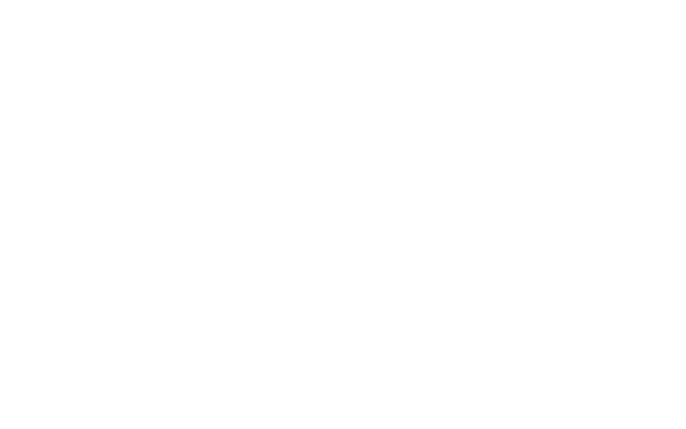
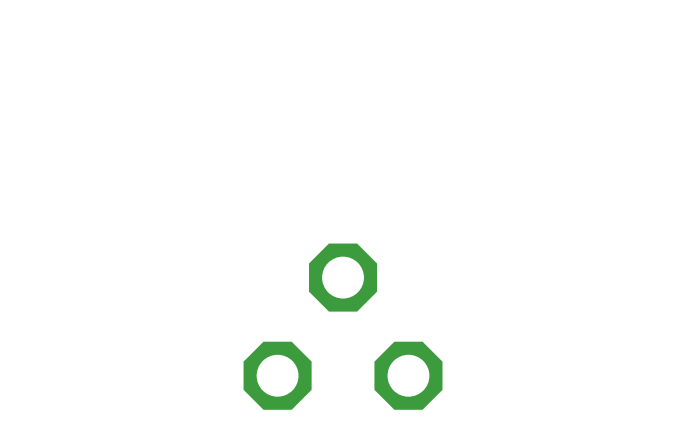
part: none -> (343, 326)

